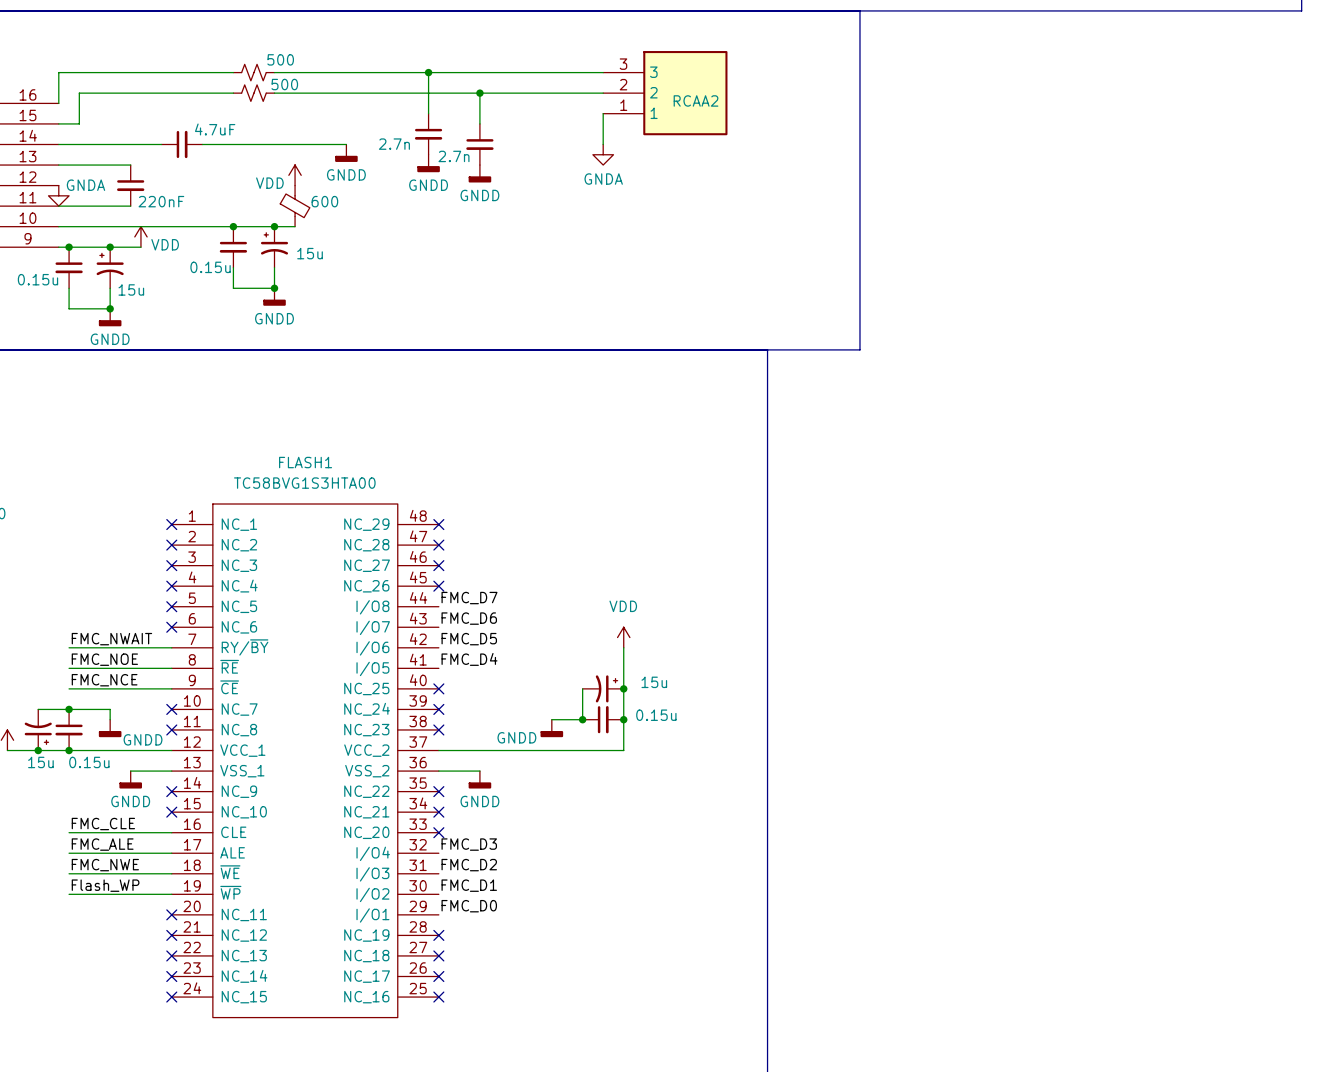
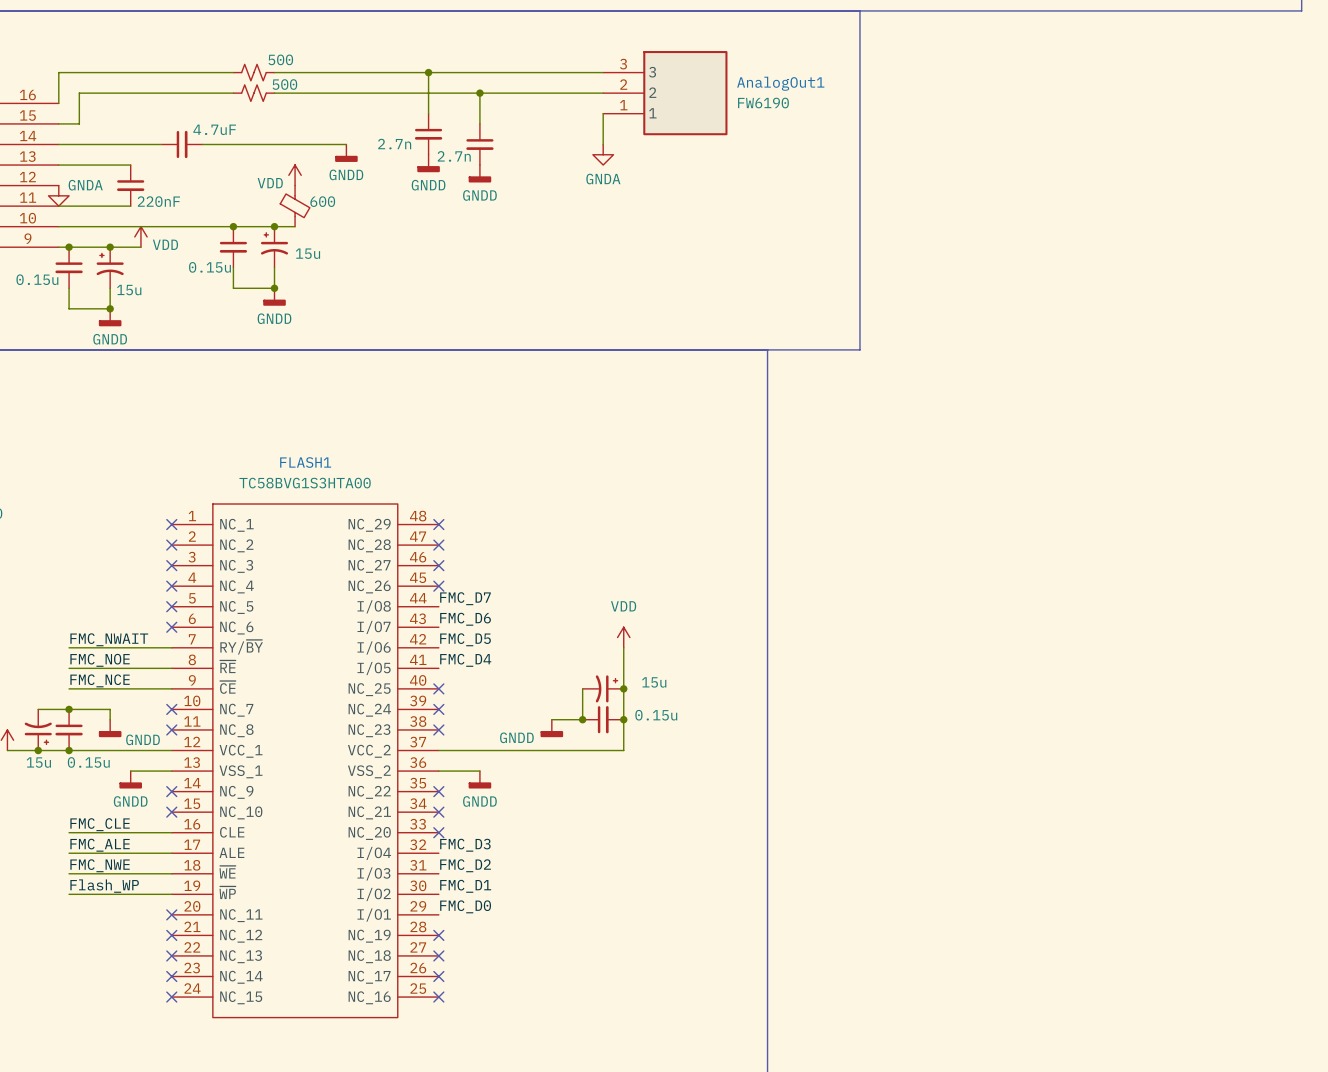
RCAA2 name: RCAA2 (696, 100) -> AnalogOut1 (780, 83)
RCAA2 value: none -> FW6190 (763, 103)

